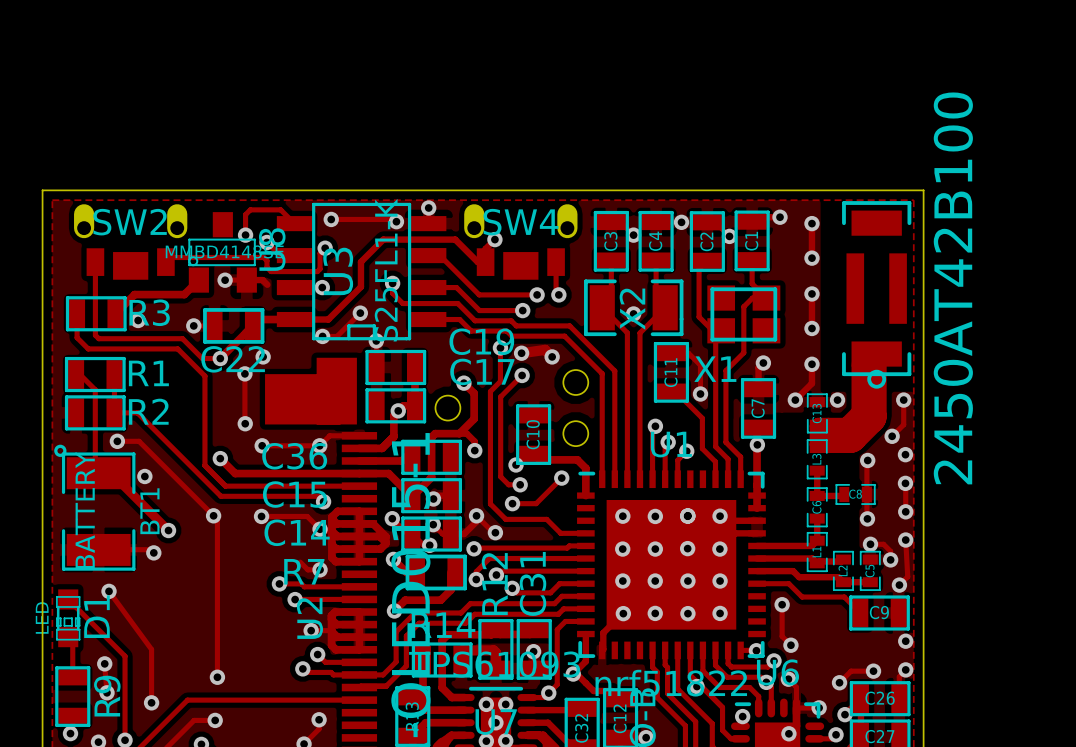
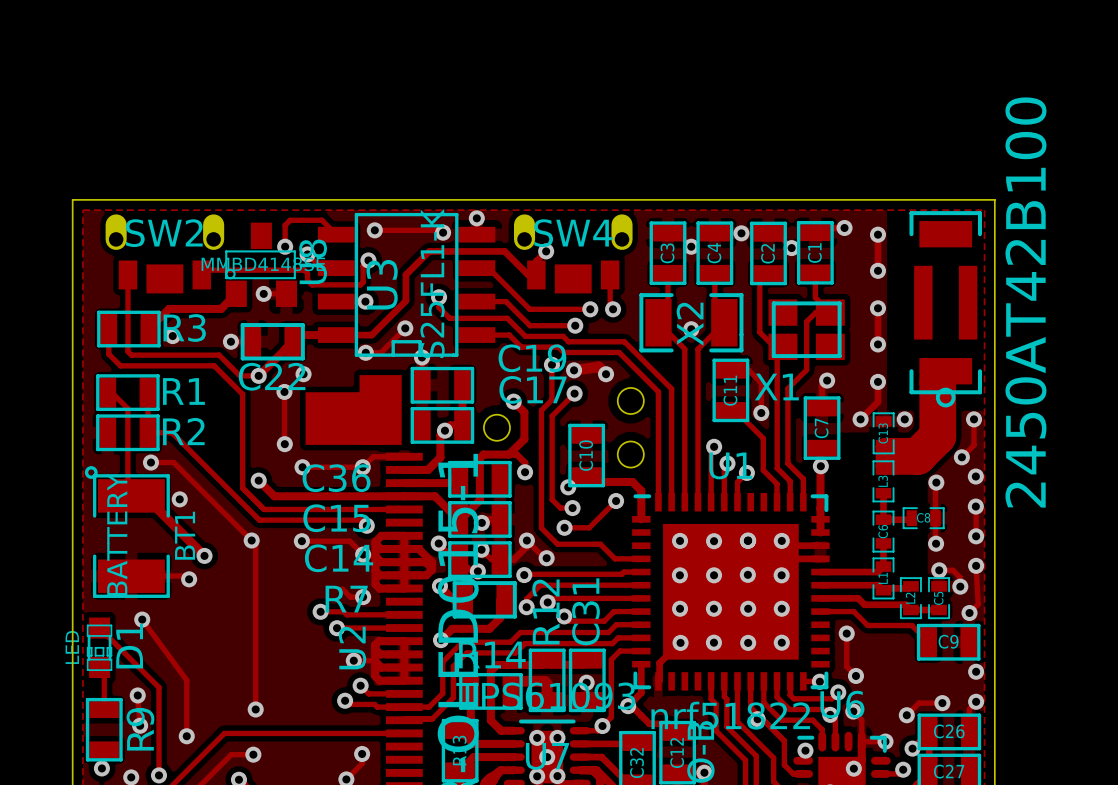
track: (246, 280) (262, 280) (267, 284) -> none

